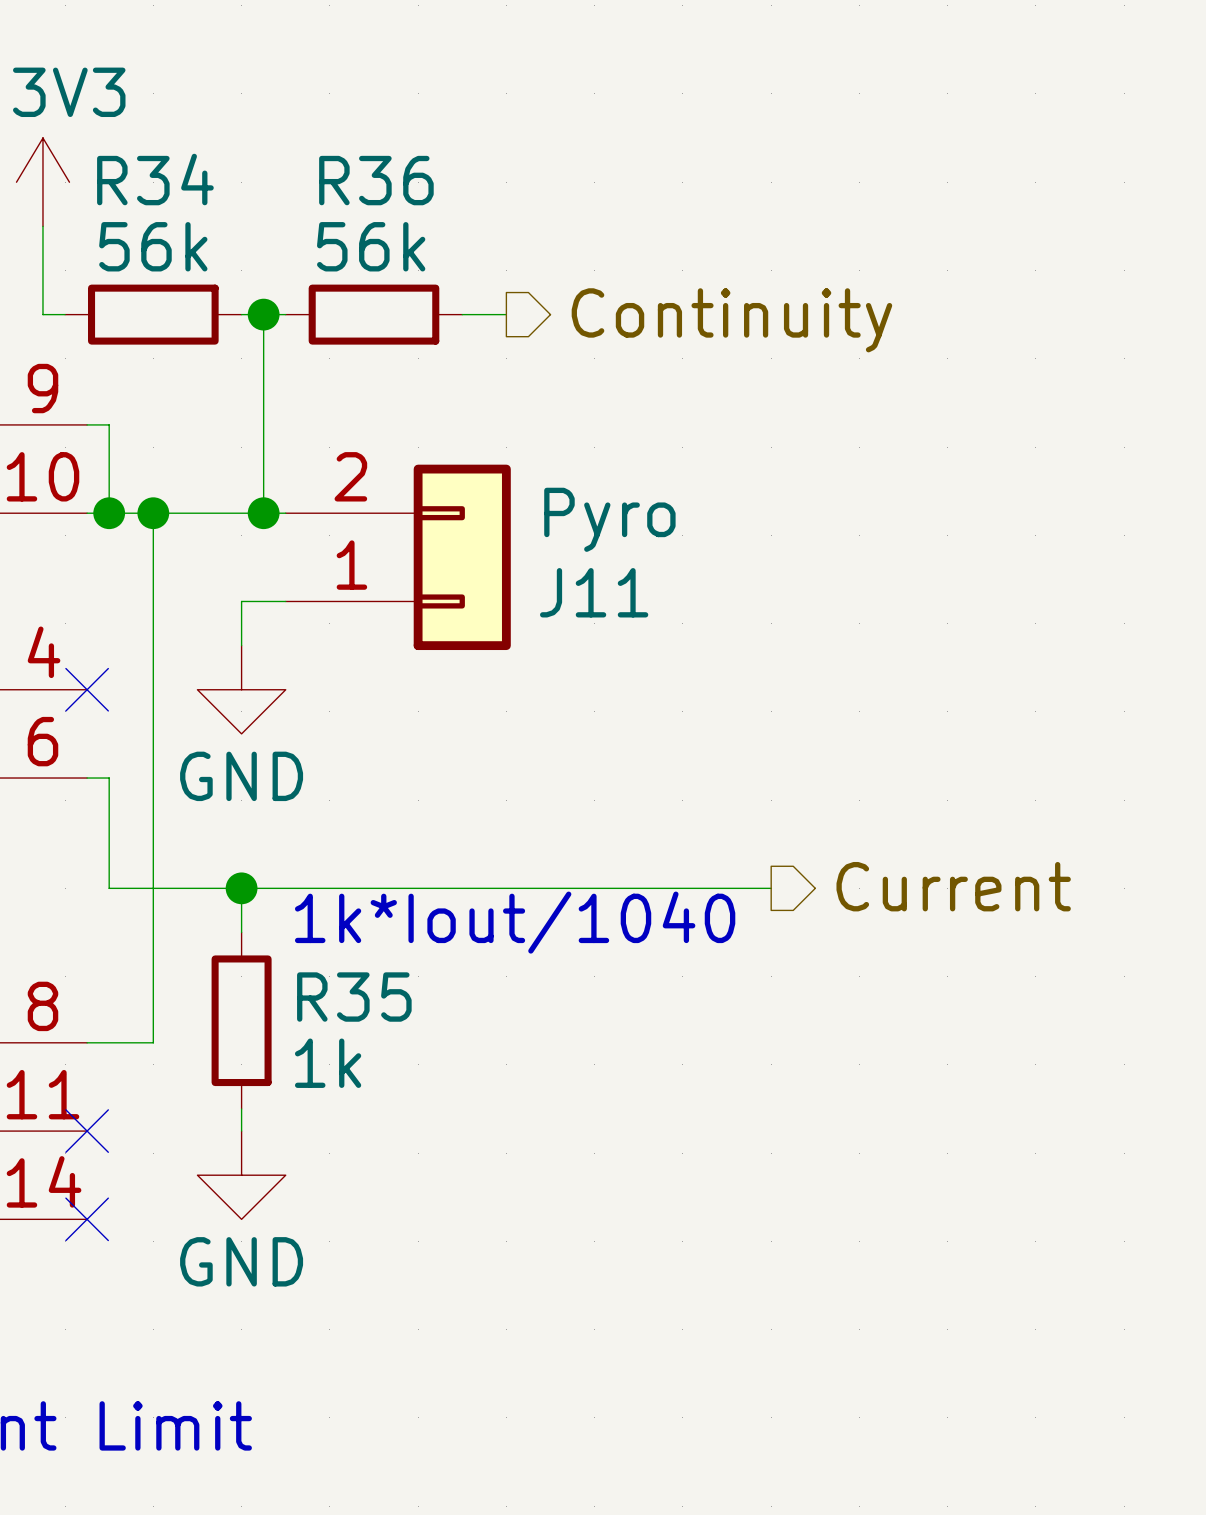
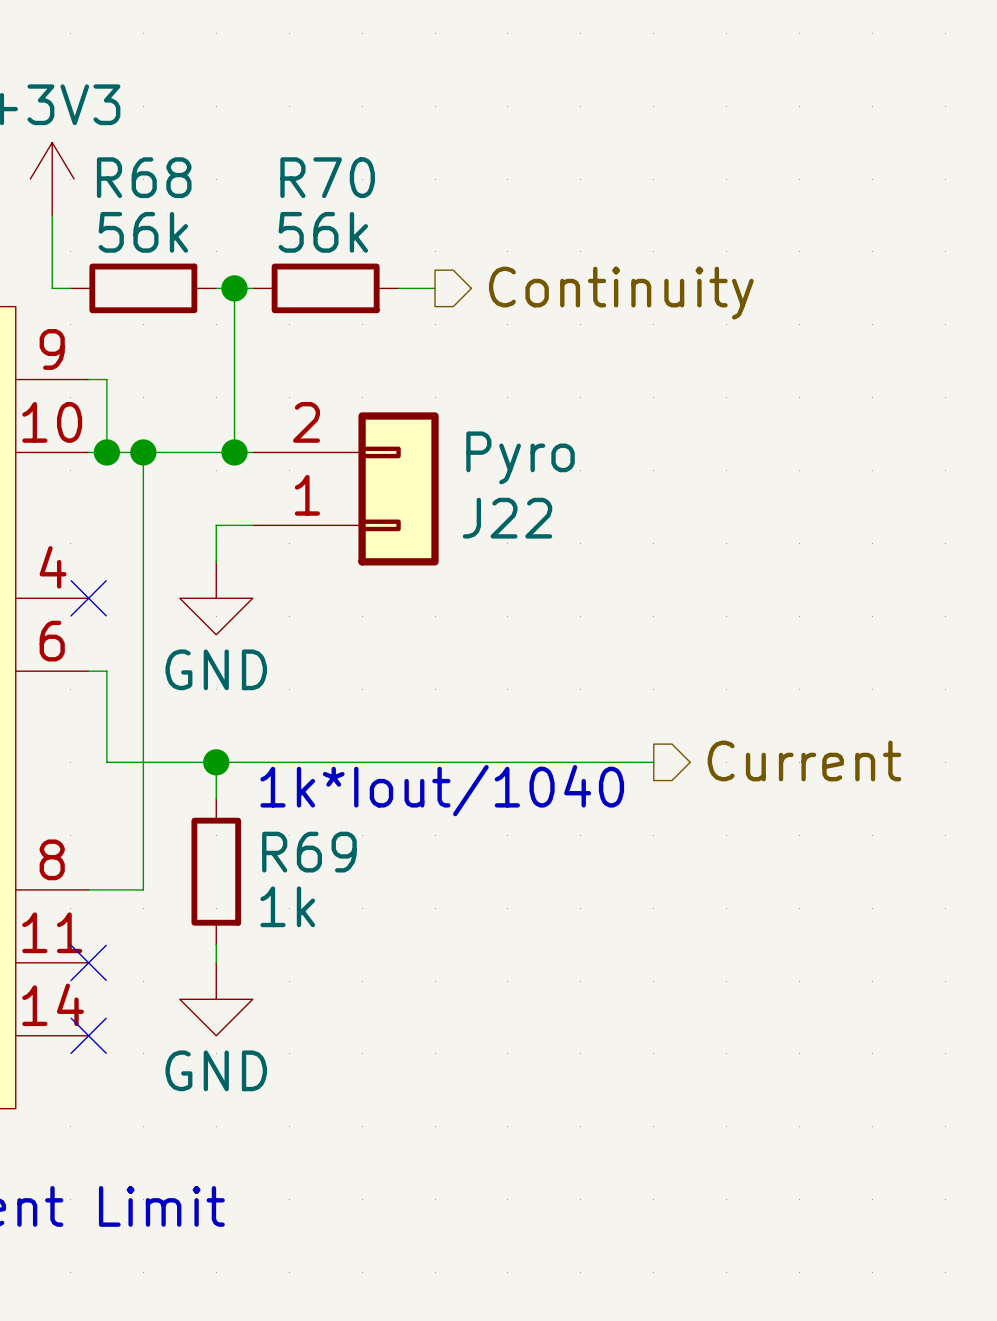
R34 name: R34 (155, 179) -> R68 (144, 177)
R36 name: R36 (376, 180) -> R70 (327, 177)
J11 name: J11 (594, 592) -> J22 (507, 518)
R35 name: R35 (354, 997) -> R69 (309, 852)

